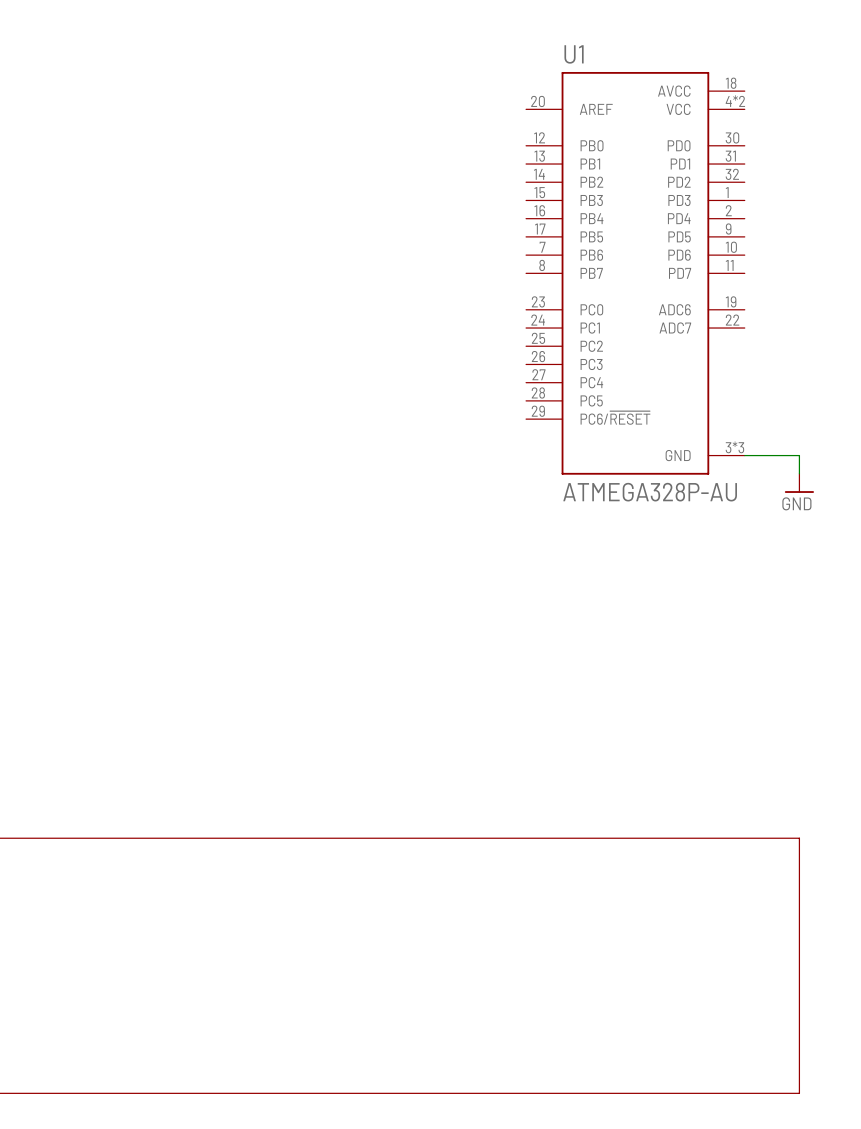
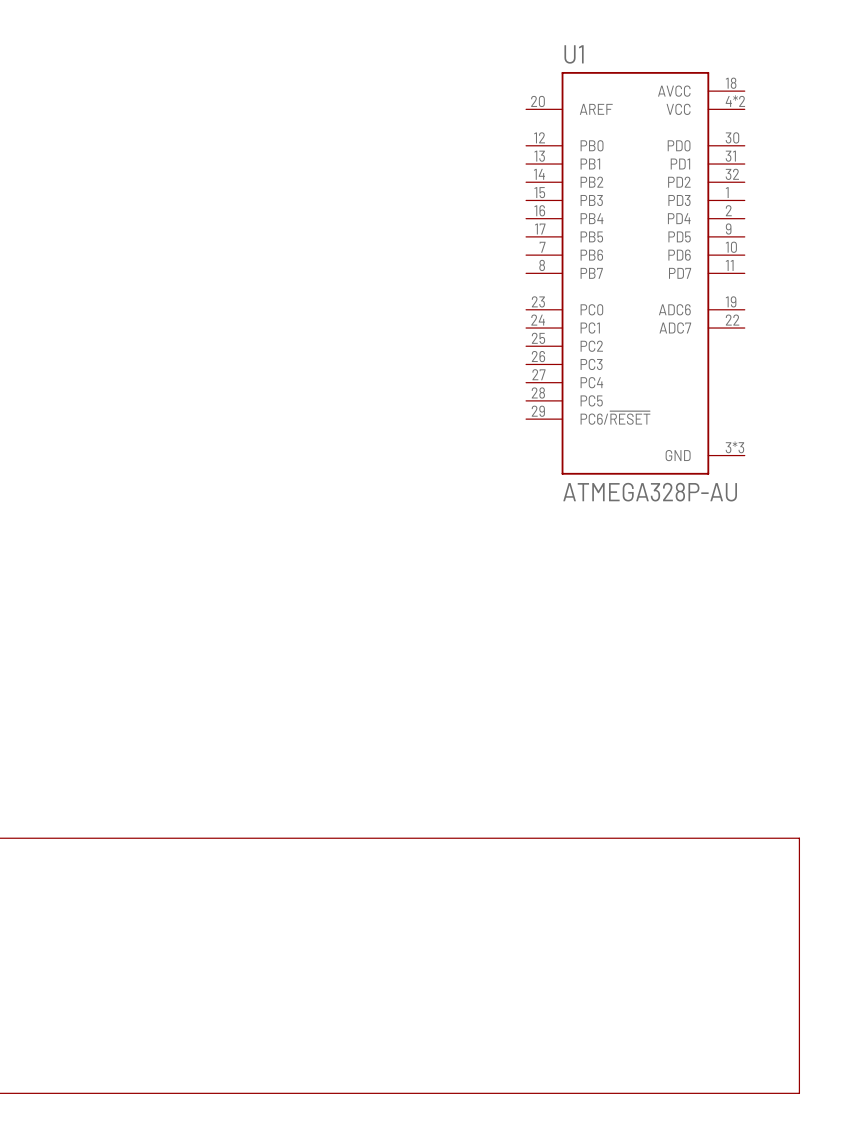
wire: (744, 455) (799, 455) (799, 473) -> none
power symbol: GND (799, 483) -> none

